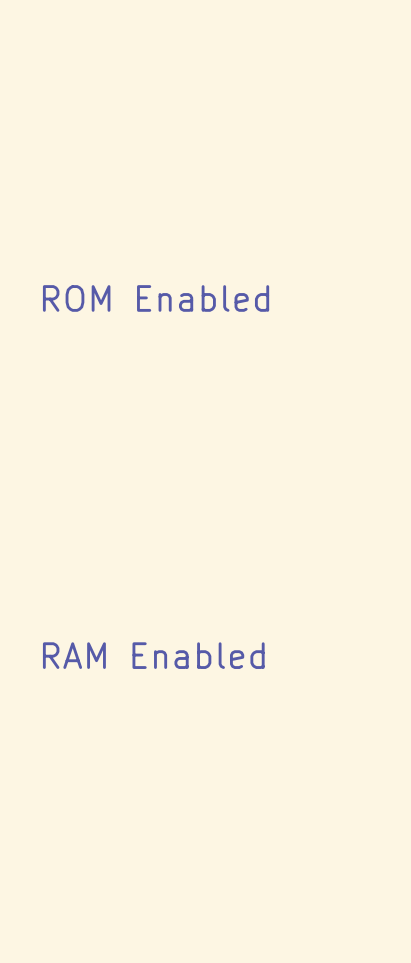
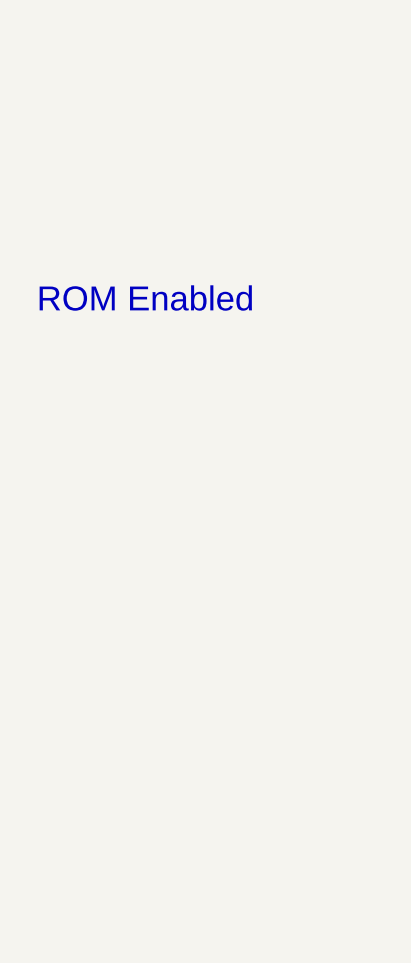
text: RAM Enabled (153, 655) -> none

